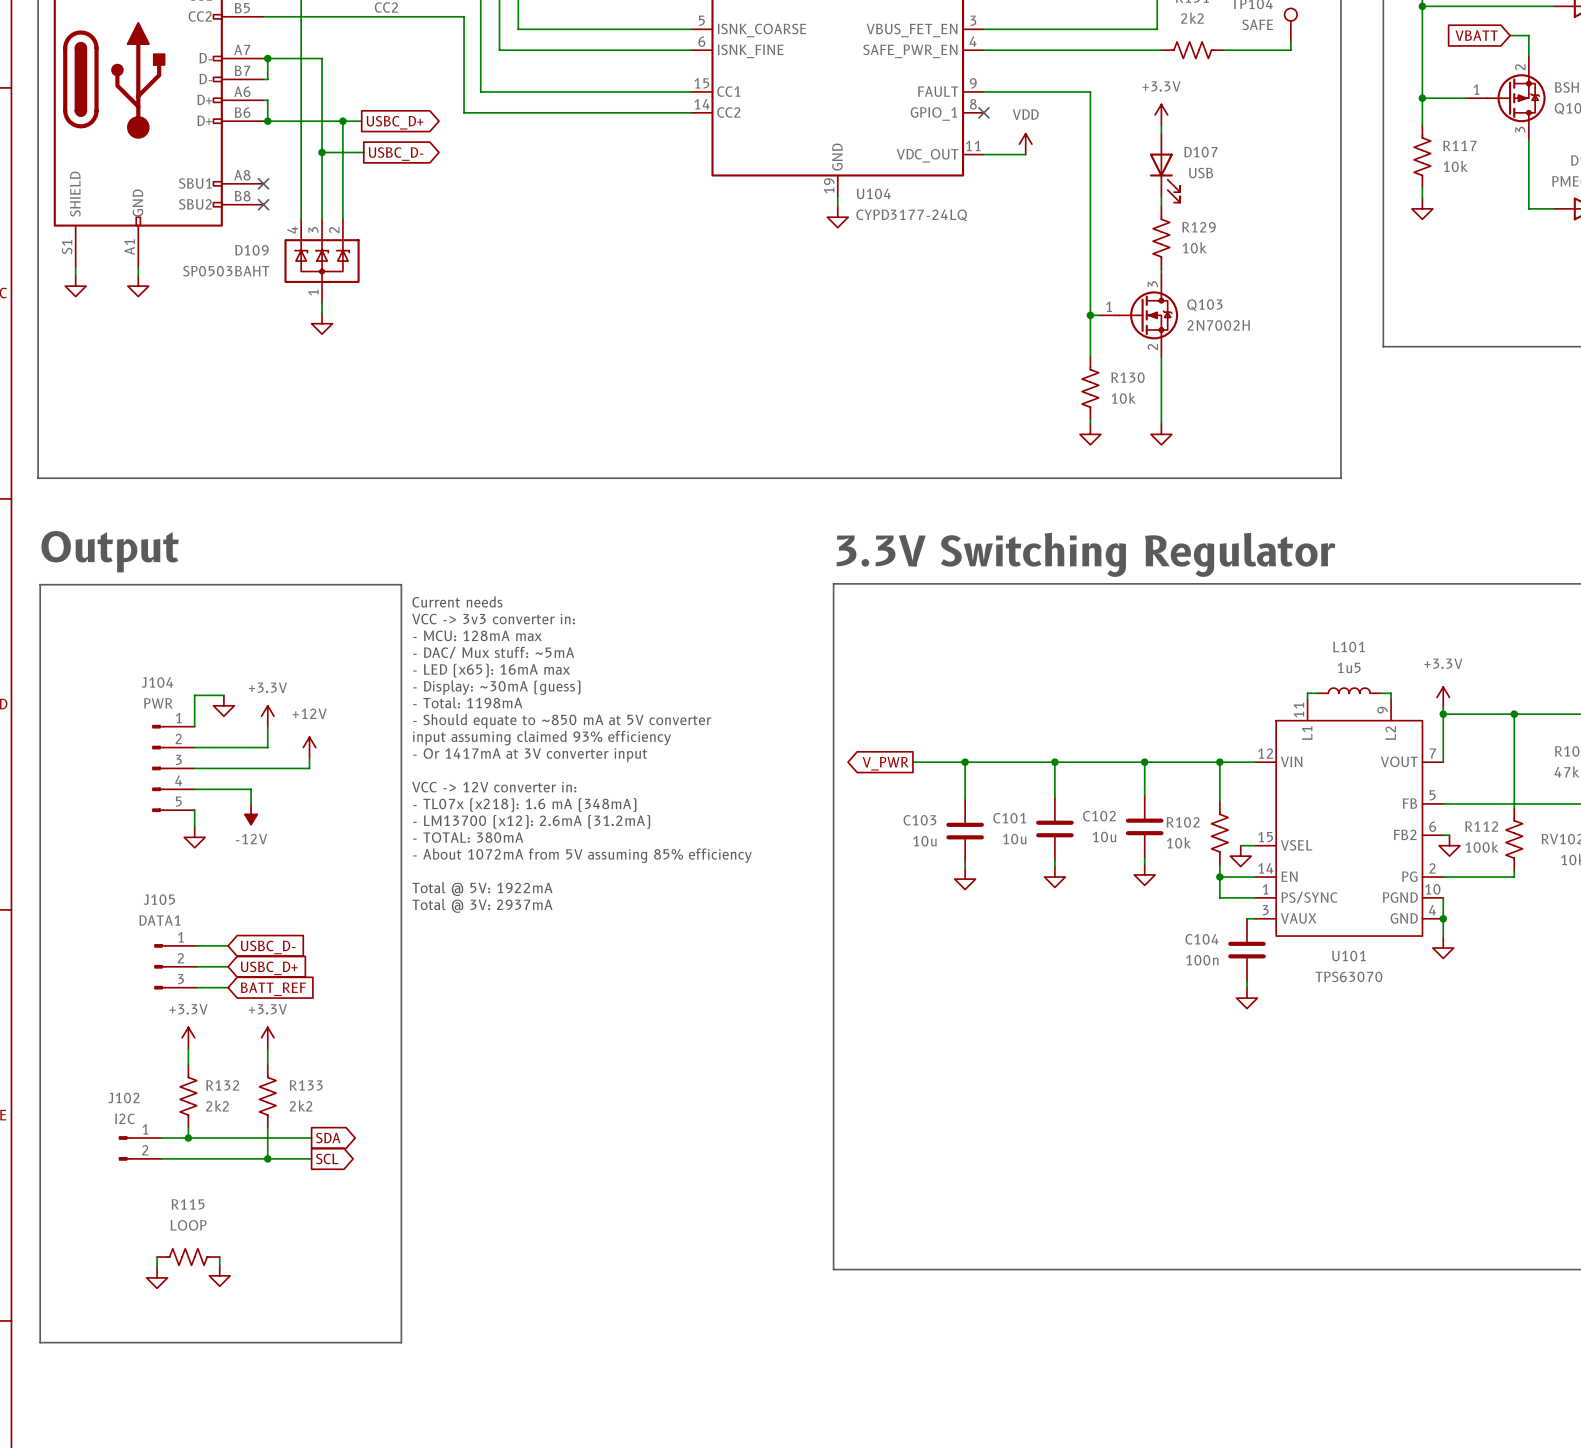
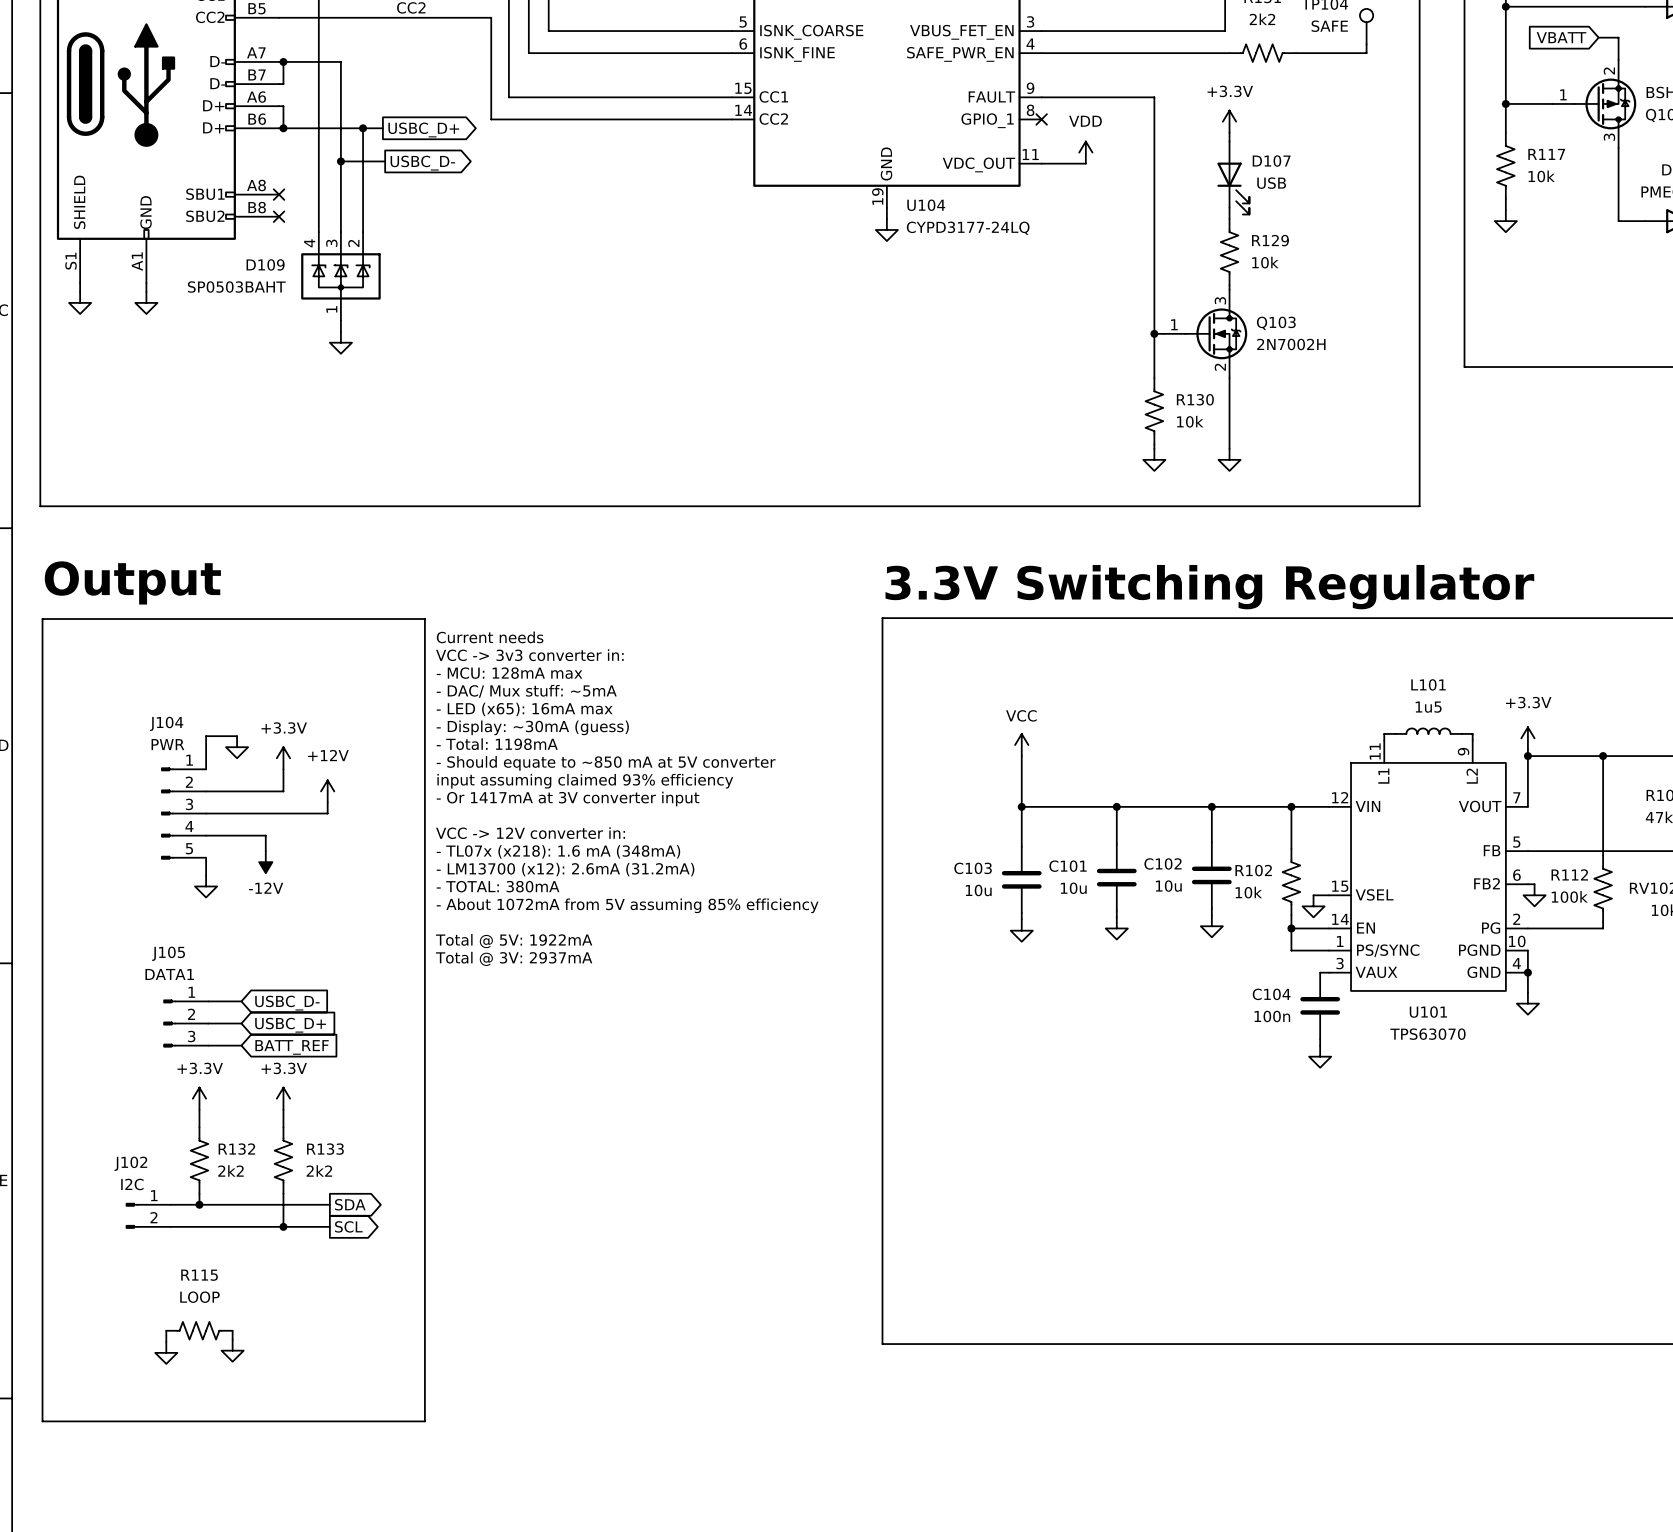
power symbol: none -> VCC (1021, 745)
wire: (912, 762) (965, 762) -> (1021, 756) (1021, 806)
global label: V_PWR (885, 763) -> none

